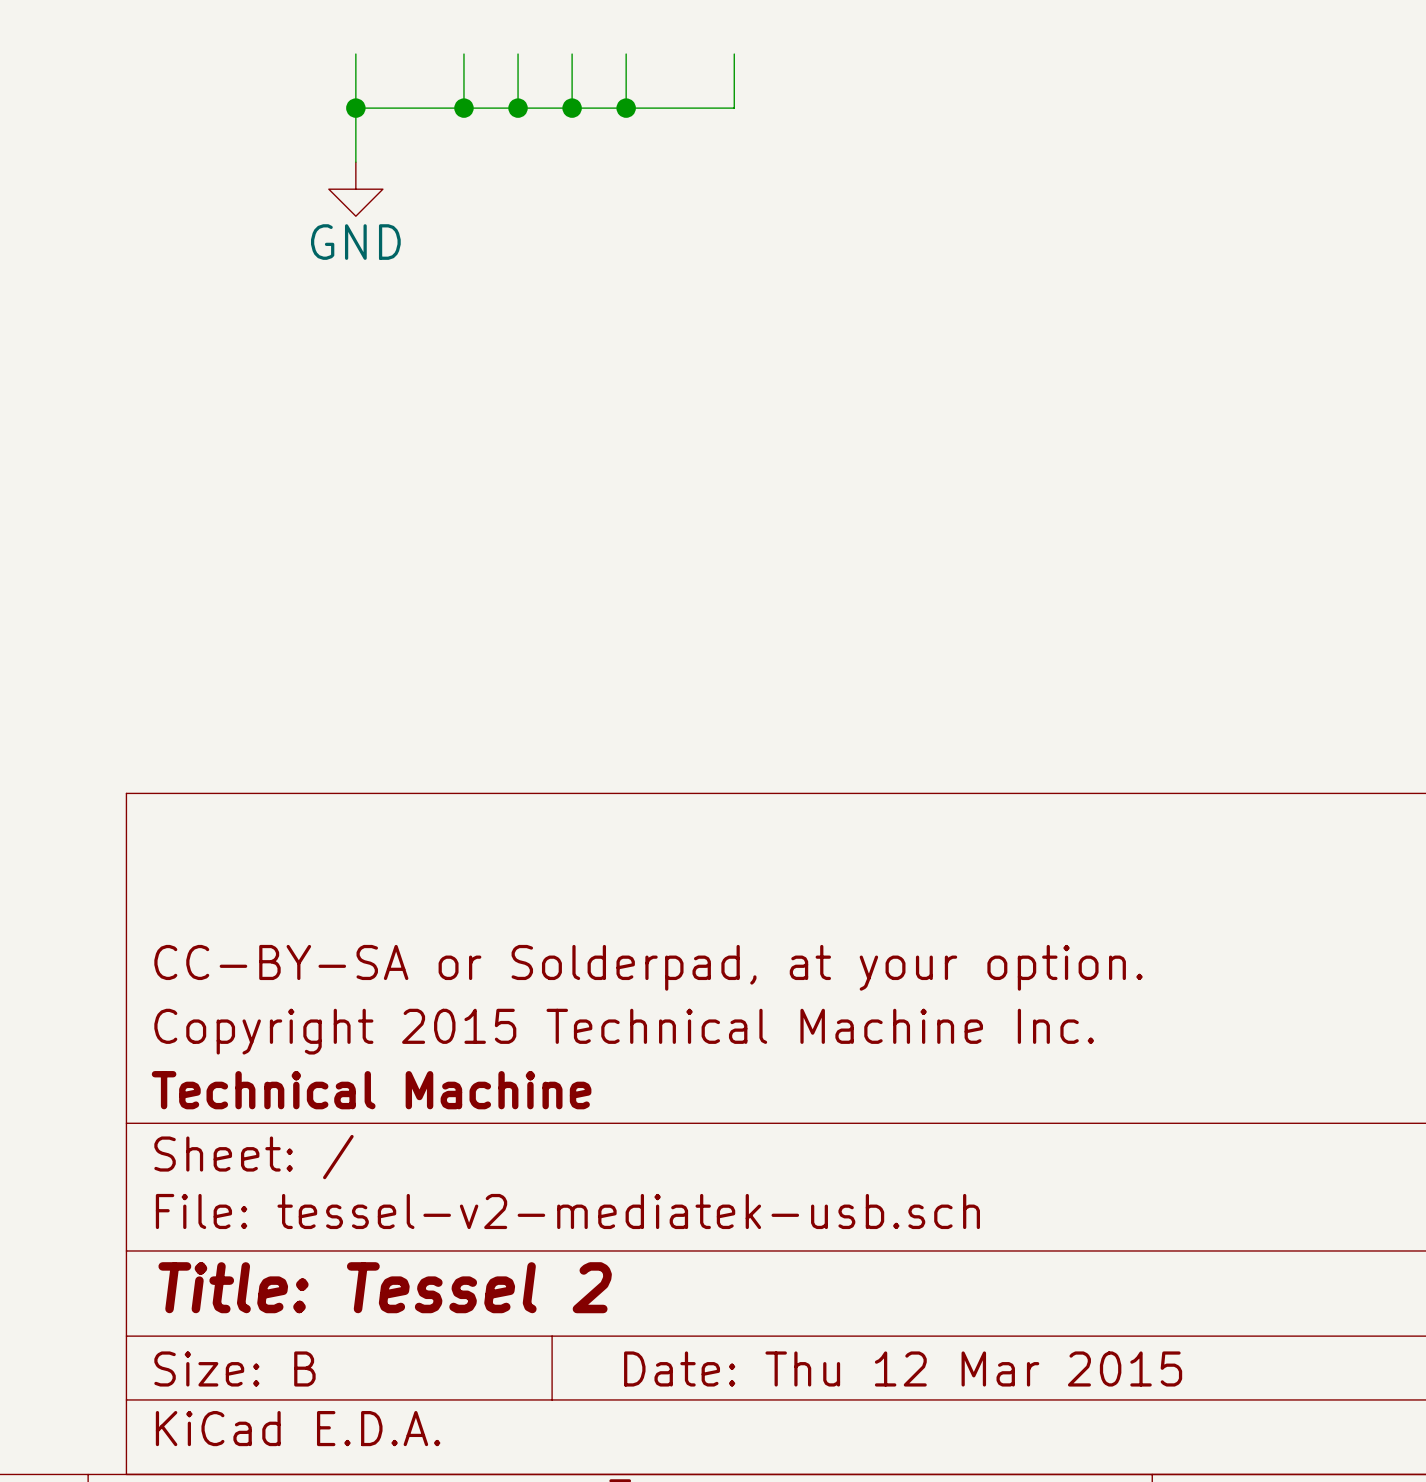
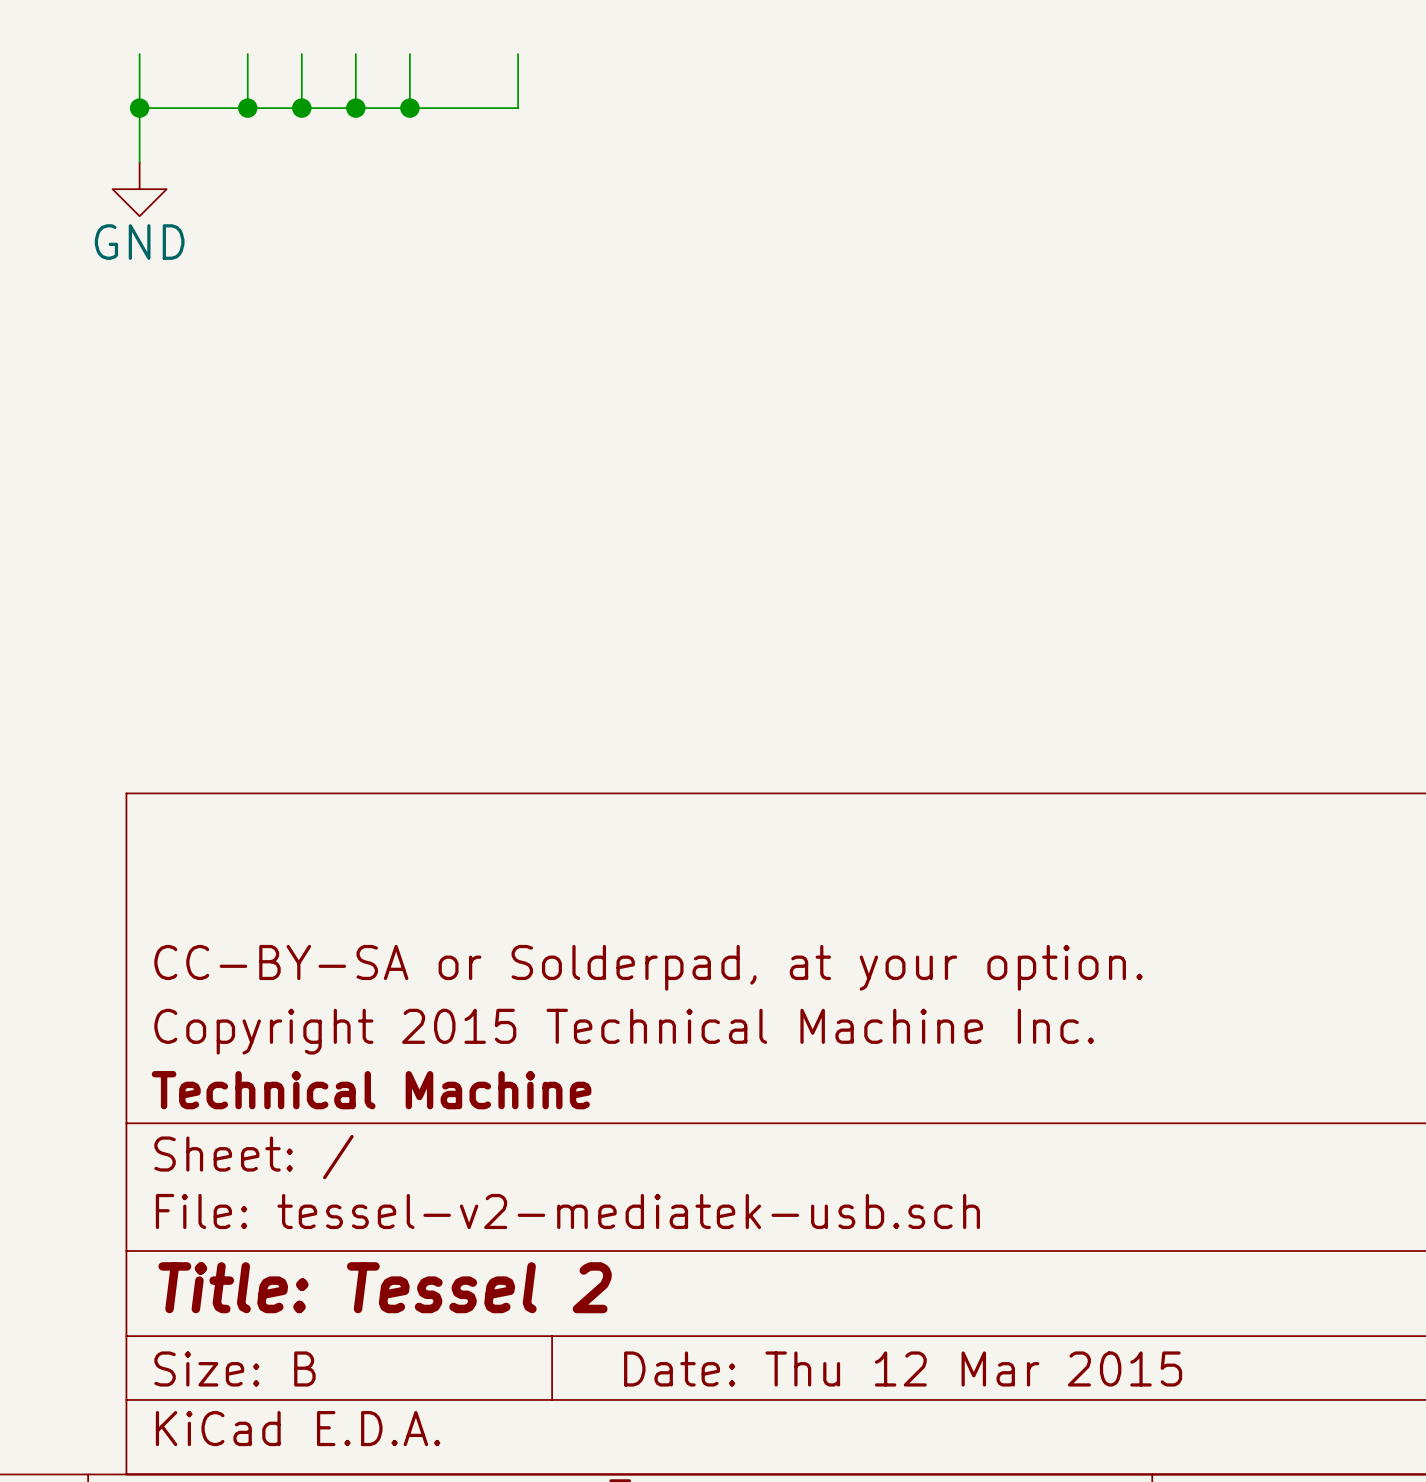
wire: none -> (139, 54) (139, 162)
wire: (463, 54) (463, 108) -> (301, 54) (301, 108)
wire: (572, 54) (572, 108) -> (409, 54) (409, 108)
wire: (626, 54) (626, 108) -> (247, 54) (247, 108)
wire: (734, 54) (734, 108) (518, 108) -> none
junction: none -> (139, 108)
junction: none -> (247, 108)
junction: none -> (301, 108)
wire: (355, 108) (355, 162) -> (355, 108) (139, 108)
junction: none -> (409, 108)
junction: (463, 108) -> none
junction: (518, 108) -> none
junction: (572, 108) -> none
junction: (626, 108) -> none
power symbol position: GND (355, 189) -> GND (139, 189)

